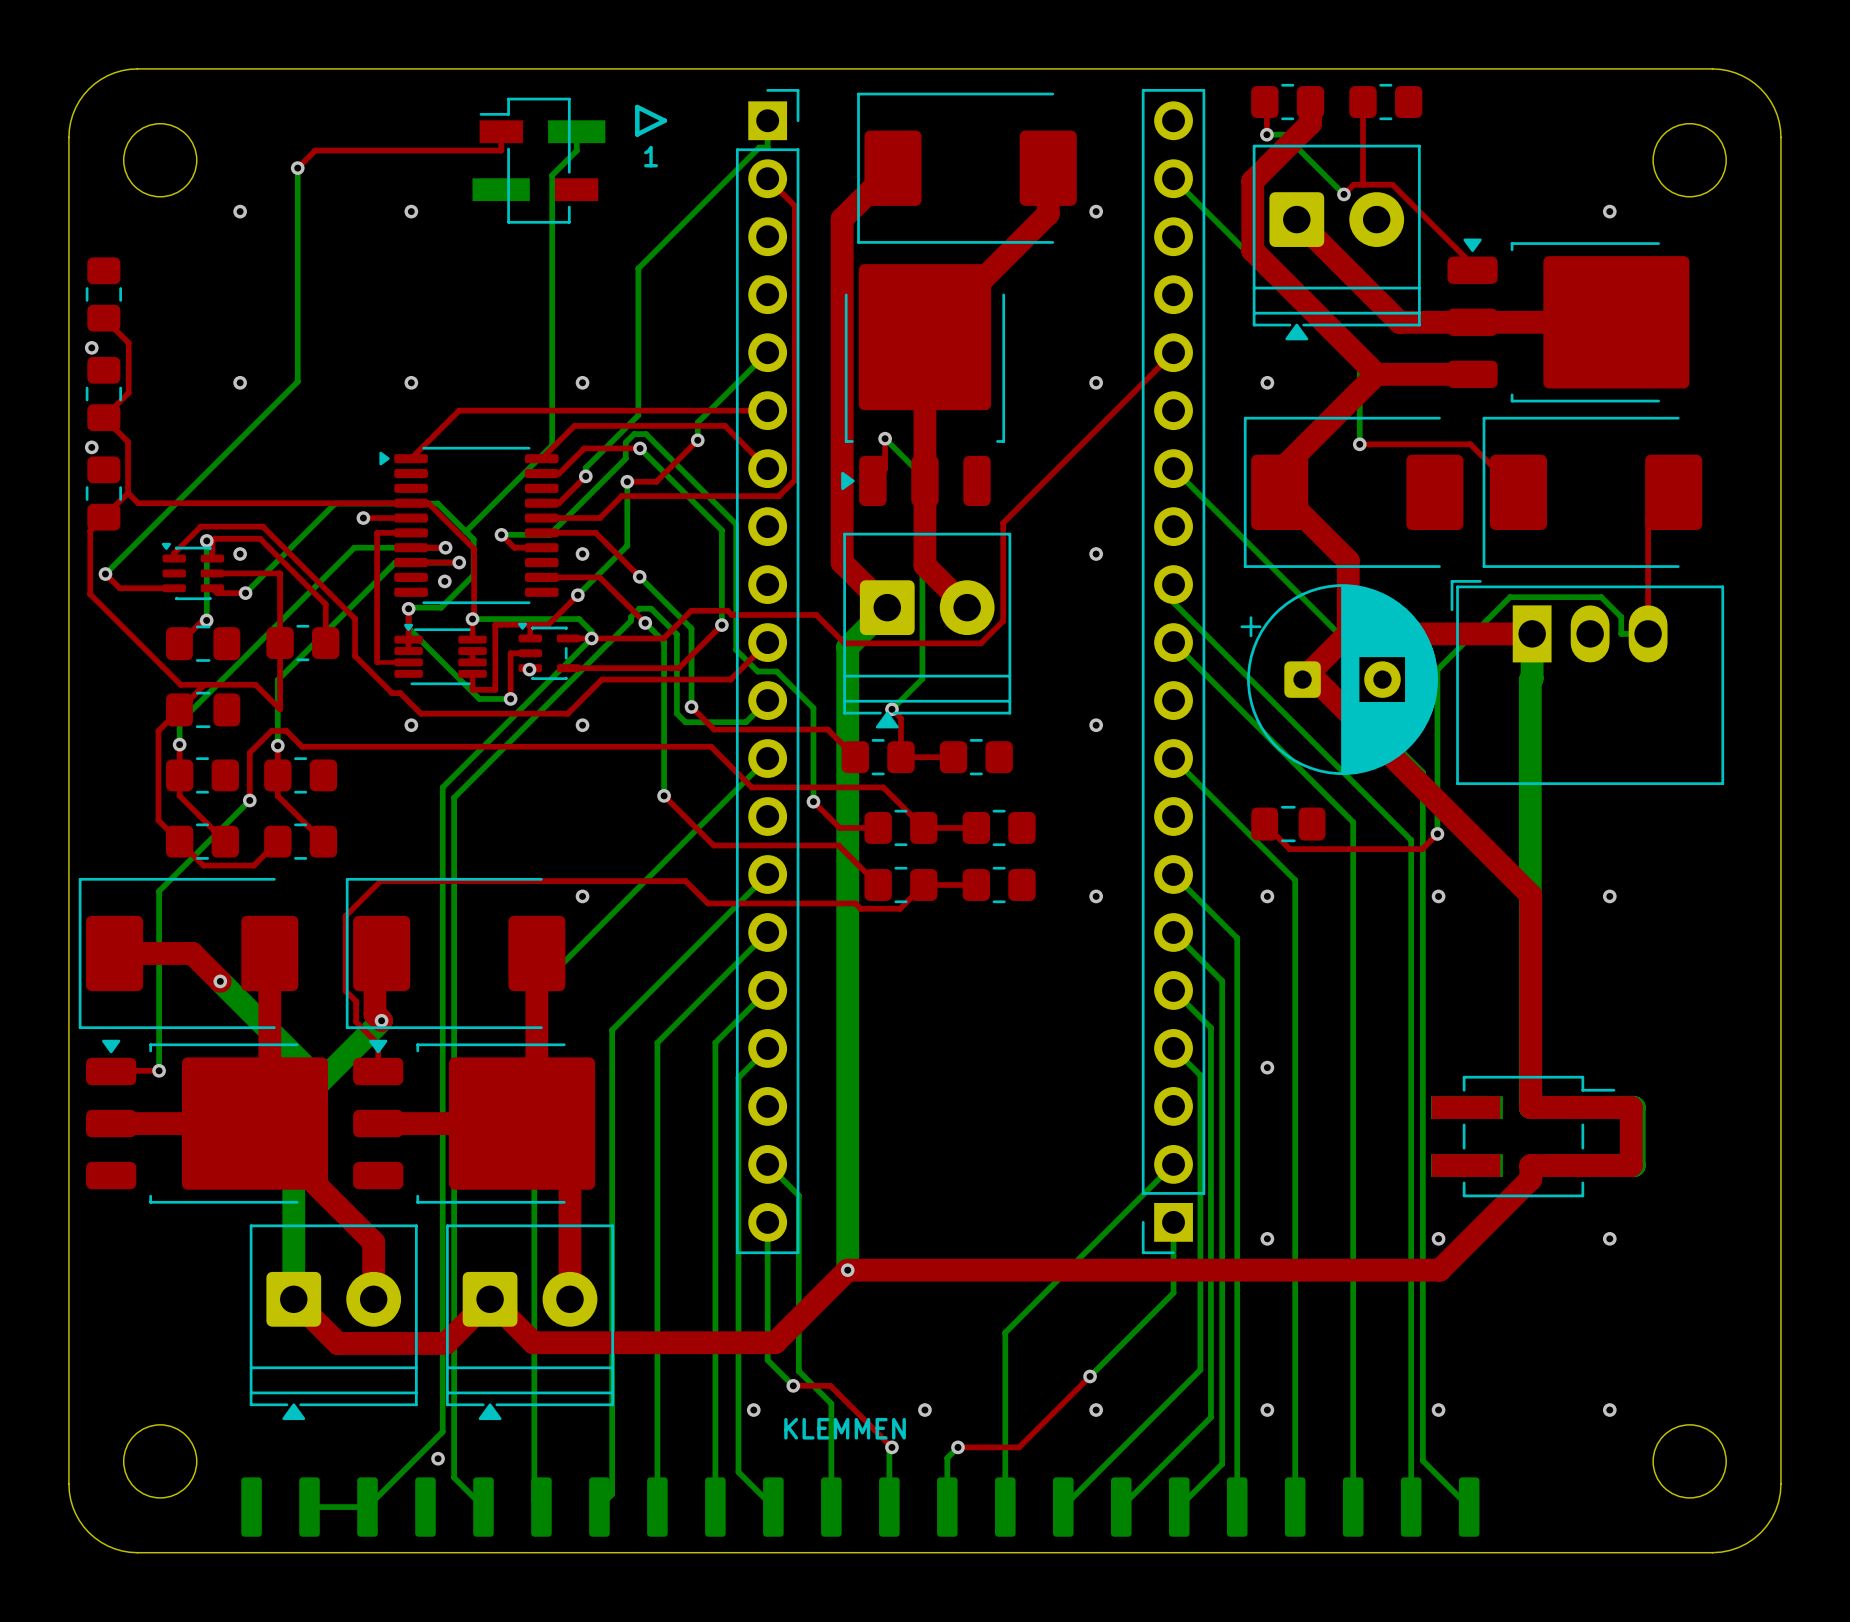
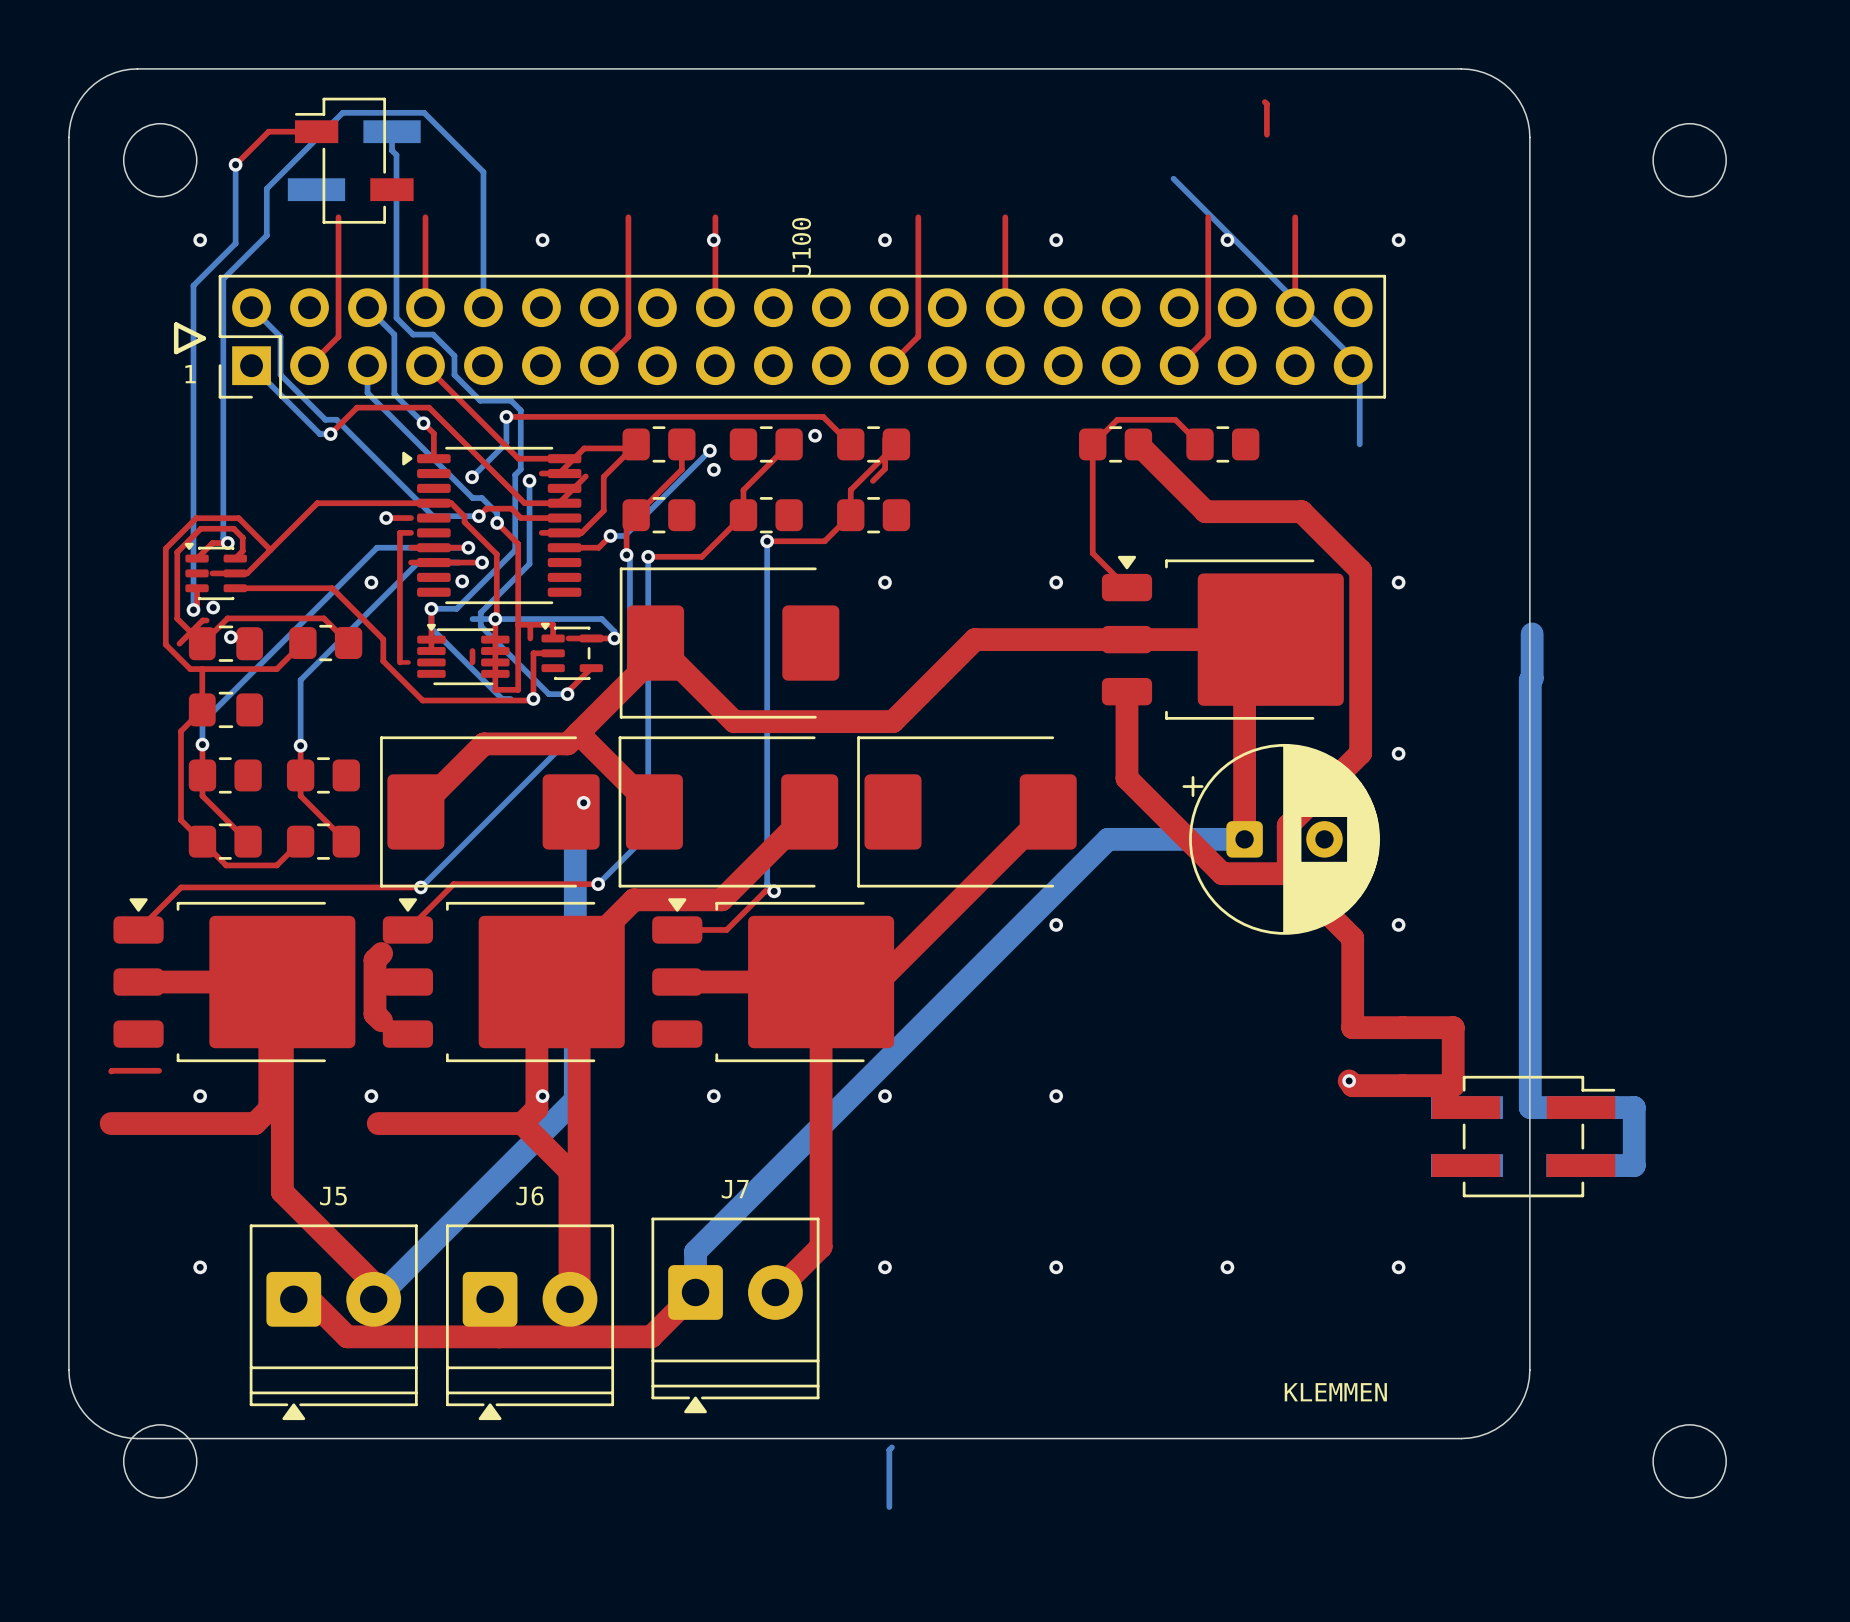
board edge: (1461, 68) (1720, 69) (1742, 75) (1760, 88) (1774, 107) (1779, 122) (1780, 137) (1780, 1484) (1775, 1510) (1760, 1532) (1738, 1547) (1712, 1552) (129, 1552) (107, 1545) (94, 1537) (79, 1520) (72, 1506) (68, 1484) (68, 1370) -> (1461, 68) (1484, 72) (1497, 79) (1509, 88) (1523, 107) (1528, 122) (1529, 137) (1529, 1370) (1524, 1396) (1509, 1418) (1487, 1433) (1461, 1438) (137, 1438) (122, 1436) (107, 1431) (88, 1418) (75, 1399) (70, 1385) (68, 1370)
part: (1287, 102) -> none
top track: (1310, 102) (1310, 123) (1252, 181) (1252, 250) (1376, 374) -> none
top track: (1363, 102) (1363, 184) -> none
part: (1385, 102) -> none
line: (637, 107) (637, 134) (664, 120) (637, 107) -> (176, 324) (176, 351) (203, 338) (176, 324)
bottom track: (767, 120) (767, 147) (759, 147) (638, 268) (638, 415) (585, 467) (585, 476) -> none
top track: none -> (316, 131) (268, 131) (235, 164)
top track: (501, 131) (501, 150) (315, 150) (297, 168) -> none
bottom track: (576, 131) (576, 150) (552, 175) (552, 445) (465, 531) -> none
bottom track: (1266, 134) (1284, 134) (1343, 194) -> none
via: (1266, 134) -> none
text position: 1 (651, 156) -> 1 (190, 374)
part position: (538, 160) -> (354, 160)
part position: (538, 160) -> (354, 160)
bottom track: none -> (235, 164) (235, 243) (193, 285) (193, 609)
via: none -> (235, 164)
bottom track: (297, 168) (297, 381) (105, 574) -> none
via: (297, 168) -> none
top track: (892, 168) (842, 219) (842, 562) (887, 607) -> none
part: (966, 168) -> none
top track: (1048, 168) (1048, 213) (924, 337) (924, 565) (967, 607) -> none
top track: (767, 178) (794, 205) (794, 480) (778, 496) (621, 496) (599, 518) (564, 518) -> none
top track: (1343, 194) (1353, 184) (1392, 184) (1472, 264) (1472, 270) -> none
via: (1343, 194) -> none
via: (240, 211) -> none
via: (411, 211) -> none
via position: (1096, 211) -> (1056, 240)
via: (1609, 211) -> none
top track: none -> (338, 217) (338, 336) (309, 365)
top track: none -> (425, 217) (425, 307)
top track: none -> (628, 217) (628, 336) (599, 365)
top track: none -> (715, 217) (715, 307)
top track: none -> (918, 217) (918, 336) (889, 365)
top track: none -> (1005, 217) (1005, 307)
top track: none -> (1208, 217) (1208, 336) (1179, 365)
top track: none -> (1295, 217) (1295, 307)
top track: (1296, 219) (1399, 322) (1616, 322) -> none
via: none -> (200, 240)
via: none -> (542, 240)
via: none -> (713, 240)
via: none -> (885, 240)
via: none -> (1227, 240)
via: none -> (1398, 240)
part: (1336, 242) -> none
part: (103, 294) -> none
bottom track: none -> (251, 307) (280, 336) (280, 374) (325, 419) (336, 419) (433, 516) (478, 516)
bottom track: none -> (367, 307) (394, 334) (394, 394) (423, 423)
bottom track: none -> (483, 307) (483, 172) (424, 112) (342, 112) (266, 188) (266, 235) (223, 279) (223, 538) (227, 543)
top track: (103, 318) (128, 342) (128, 392) (103, 417) (128, 441) (128, 493) -> none
part: (1568, 320) -> none
J100: none -> (802, 336)
via: (91, 347) -> none
bottom track: (767, 352) (697, 422) (697, 440) -> none
top track: (1173, 352) (1003, 523) (1003, 621) (980, 643) (844, 643) (816, 614) (731, 614) (727, 610) (691, 610) (663, 638) (614, 638) -> none
bottom track: none -> (251, 365) (319, 434) (330, 434)
bottom track: none -> (367, 365) (367, 392) (472, 498) (481, 498) (497, 513) (497, 523)
top track: none -> (425, 365) (518, 458) (564, 458)
top track: (1376, 374) (1472, 374) -> none
top track: (1376, 374) (1279, 471) (1279, 492) (1348, 560) (1348, 633) -> none
via: (240, 382) -> none
via position: (411, 382) -> (423, 423)
via: (582, 382) -> none
via: (1096, 382) -> none
via: (1267, 382) -> none
part: (923, 385) -> none
part: (103, 393) -> none
top track: (767, 410) (459, 410) (411, 458) -> none
top track: none -> (506, 416) (823, 416) (850, 444)
bottom track: none -> (506, 416) (506, 442) (472, 477)
via: none -> (506, 416)
top track: none -> (423, 423) (433, 433) (433, 458)
top track: none -> (330, 434) (357, 407) (429, 407) (524, 503) (541, 503)
via: none -> (330, 434)
via: none -> (815, 435)
bottom track: (885, 438) (922, 475) (922, 678) (892, 709) -> none
via: (885, 438) -> none
top track: (697, 440) (656, 481) (627, 481) -> none
via position: (697, 440) -> (709, 450)
part: none -> (659, 444)
top track: none -> (681, 444) (681, 469) (626, 524) (626, 555)
part: none -> (766, 444)
top track: none -> (789, 444) (743, 490) (743, 515) (701, 556) (648, 556)
part: none -> (873, 444)
top track: none -> (896, 444) (850, 490) (850, 515) (824, 541) (767, 541)
part: none -> (1115, 444)
top track: none -> (1138, 444) (1205, 511) (1301, 511) (1360, 570) (1360, 753) (1288, 825) (1288, 873)
top track: none -> (1200, 444) (1175, 419) (1117, 419) (1092, 444) (1092, 553) (1126, 587)
part: none -> (1222, 444)
top track: (1359, 444) (1470, 444) (1518, 492) -> none
via: (1359, 444) -> none
via: (91, 447) -> none
bottom track: (640, 448) (721, 530) (721, 625) -> none
via: (640, 448) -> none
bottom track: none -> (709, 450) (624, 535) (610, 535)
top track: (541, 458) (574, 425) (724, 425) (767, 468) -> none
bottom track: (1173, 468) (1346, 641) (1346, 695) (1422, 772) (1422, 1460) (1469, 1507) -> none
via: none -> (713, 469)
via: (585, 476) -> none
via: none -> (472, 477)
bottom track: none -> (529, 480) (529, 563) (480, 612) (480, 626) (548, 694) (567, 694)
via: none -> (529, 480)
bottom track: (627, 481) (627, 545) (577, 595) -> none
via: (627, 481) -> none
part: (1353, 492) -> none
part: (1592, 492) -> none
top track: (1673, 492) (1648, 517) (1648, 633) -> none
part: (103, 493) -> none
top track: (128, 493) (138, 503) (317, 503) -> (247, 573) (317, 503)
top track: (128, 493) (90, 530) (90, 594) (180, 684) (255, 684) (280, 709) (280, 573) (247, 573) -> none
top track: (428, 503) (474, 548) (472, 639) -> (428, 503) (451, 503) (464, 516) (464, 522) (496, 554) (495, 624)
part: none -> (659, 515)
part: none -> (766, 515)
part: none -> (873, 515)
top track: none -> (478, 516) (486, 508) (511, 508) (520, 518) (541, 518)
via: none -> (478, 516)
top track: (363, 518) (386, 518) -> (445, 547) (468, 547)
via position: (363, 518) -> (386, 518)
part position: (468, 525) -> (491, 525)
top track: (399, 532) (377, 532) (377, 662) (399, 662) -> (399, 532) (399, 662)
top track: (581, 532) (595, 532) (639, 576) -> (581, 532) (603, 510) (603, 476) (636, 444)
top track: (501, 534) (514, 547) (541, 547) -> none
bottom track: (501, 534) (549, 534) (625, 458) (625, 442) (634, 434) (646, 434) (736, 524) (736, 650) (757, 671) (776, 671) (813, 708) (813, 801) -> none
via position: (501, 534) -> (497, 523)
top track: none -> (610, 535) (598, 547) (564, 547)
via: none -> (610, 535)
bottom track: (206, 540) (206, 620) -> none
via: (206, 540) -> none
top track: (212, 540) (212, 558) -> none
top track: (212, 540) (214, 538) (260, 538) (325, 604) (325, 643) -> none
bottom track: none -> (767, 541) (767, 884) (774, 891)
via: none -> (767, 541)
top track: none -> (227, 543) (212, 543) (197, 558)
bottom track: (377, 547) (354, 547) (179, 722) (179, 744) -> (377, 547) (202, 722) (202, 744)
via: (445, 547) -> none
via: none -> (468, 547)
top track: none -> (270, 550) (238, 518) (196, 518) (165, 548) (165, 644) (190, 669) (276, 669) (302, 643)
via position: (240, 554) -> (227, 543)
via: (582, 554) -> none
via position: (1096, 554) -> (1056, 582)
bottom track: none -> (626, 555) (629, 558) (629, 678) (420, 887)
via: none -> (626, 555)
bottom track: none -> (648, 556) (648, 834) (598, 884)
via: none -> (648, 556)
top track: (174, 558) (174, 553) (200, 526) (262, 526) (355, 618) (355, 656) (392, 693) (400, 693) (420, 713) (567, 713) (601, 679) (730, 679) (767, 642) -> none
top track: none -> (235, 558) (242, 551) (242, 537) (233, 528) (200, 528) (177, 552) (177, 618) (202, 643) (227, 618) (323, 618) (348, 643)
bottom track: (418, 562) (395, 562) (277, 680) (277, 745) -> (418, 562) (300, 680) (300, 745)
via: (459, 562) -> none
via: none -> (482, 562)
part position: (192, 571) -> (215, 571)
top track: (105, 574) (119, 588) (174, 588) -> none
via: (105, 574) -> none
bottom track: (639, 576) (691, 628) (691, 706) -> none
via: (639, 576) -> none
top track: (541, 577) (599, 577) (645, 622) -> none
via: (444, 581) -> none
via: none -> (462, 581)
via: none -> (371, 582)
via: none -> (885, 582)
via: none -> (1398, 582)
bottom track: (1173, 584) (1173, 602) (1411, 840) (1411, 1507) -> none
top track: none -> (197, 588) (197, 606) (193, 609)
top track: (212, 588) (217, 593) (245, 593) -> none
top track: none -> (235, 588) (332, 588) (383, 639) (383, 661) (422, 700) (531, 700) (533, 698) (533, 653) (553, 653)
bottom track: (245, 593) (335, 503) (437, 503) (473, 539) (473, 575) (441, 607) (409, 607) (408, 628) (479, 698) (502, 698) -> (392, 131) (392, 150) (396, 155) (396, 317) (413, 334) (433, 334) (454, 355) (454, 374) (480, 400) (511, 400) (520, 410) (520, 469) (515, 474) (515, 550) (456, 608) (431, 608) (431, 628) (502, 698)
via: (245, 593) -> none
top track: (577, 595) (548, 624) -> (553, 638) (553, 624) (548, 624)
via: (577, 595) -> none
via: none -> (213, 607)
bottom track: (887, 607) (847, 647) (847, 1270) -> none
top track: (408, 608) (408, 651) -> (431, 608) (431, 651)
via: (408, 608) -> none
via: none -> (431, 608)
via: none -> (193, 609)
via: (472, 619) -> none
via: none -> (495, 619)
bottom track: (579, 619) (591, 631) (591, 638) (442, 787) (442, 1431) (367, 1507) (309, 1507) -> (579, 619) (601, 619) (614, 631) (614, 638)
via: (206, 620) -> none
bottom track: (645, 622) (664, 641) (664, 795) -> none
via: (645, 622) -> none
top track: (495, 624) (518, 624) -> (459, 562) (482, 562)
top track: (721, 625) (678, 668) (568, 668) -> none
via: (721, 625) -> none
part: (927, 630) -> none
top track: (1348, 633) (1302, 679) (1315, 679) (1530, 894) (1530, 1107) (1631, 1107) (1631, 1165) (1530, 1165) (1530, 1179) (1439, 1270) (847, 1270) (775, 1342) (533, 1342) (490, 1299) (445, 1343) (337, 1343) (293, 1299) -> none
top track: (1348, 633) (1532, 633) -> none
bottom track: (1648, 633) (1621, 633) (1621, 617) (1601, 597) (1510, 597) (1437, 669) (1437, 833) -> none
via: none -> (230, 637)
part: none -> (1222, 637)
via: (591, 638) -> none
via: none -> (614, 638)
bottom track: (1173, 642) (1353, 822) (1353, 1507) -> none
part position: (203, 643) -> (225, 643)
part position: (302, 643) -> (325, 643)
part: none -> (729, 643)
part position: (549, 651) -> (571, 651)
top track: (530, 653) (510, 653) (510, 698) -> none
part position: (440, 654) -> (463, 654)
top track: none -> (1244, 665) (1244, 839)
top track: none -> (1244, 665) (1218, 639) (974, 639) (892, 721) (734, 721) (655, 643) (655, 655) (567, 743) (483, 743) (415, 811)
top track: none -> (591, 668) (567, 694)
top track: none -> (202, 669) (202, 709) (180, 731) (180, 820) (226, 865) (276, 865) (300, 841)
via: (529, 669) -> none
part: (767, 671) -> none
part: (1173, 671) -> none
top track: (472, 673) (472, 689) (495, 689) -> (497, 523) (518, 543) (518, 689) (495, 689)
part: (1339, 679) -> none
part: (1587, 682) -> none
top track: (204, 684) (158, 730) (158, 820) (203, 865) (253, 865) (277, 841) -> none
top track: none -> (1126, 691) (1126, 778) (1222, 873) (1288, 873)
via: none -> (567, 694)
via: (510, 698) -> none
via: none -> (533, 698)
bottom track: (767, 700) (746, 722) (685, 722) (676, 713) (676, 634) (651, 608) (639, 608) (630, 617) (630, 620) (454, 797) (454, 1477) (483, 1507) -> none
top track: (691, 706) (714, 729) (827, 729) (855, 757) -> none
via: (691, 706) -> none
part position: (203, 709) -> (225, 709)
top track: (892, 709) (900, 718) (900, 757) (953, 757) -> none
via: (892, 709) -> none
via: (411, 725) -> none
via: (582, 725) -> none
via: (1096, 725) -> none
top track: none -> (578, 733) (654, 809) (654, 811)
top track: (179, 744) (179, 795) (225, 841) -> (202, 744) (202, 795) (248, 841)
via position: (179, 744) -> (202, 744)
top track: (277, 745) (277, 795) (323, 841) -> (300, 745) (300, 795) (346, 841)
via position: (277, 745) -> (300, 745)
via: none -> (1398, 753)
part: (878, 757) -> none
part: (976, 757) -> none
bottom track: (767, 758) (534, 991) (534, 1499) (541, 1507) -> none
bottom track: (1173, 758) (1295, 880) (1295, 1507) -> none
part position: (202, 775) -> (225, 775)
part position: (300, 775) -> (323, 775)
top track: (664, 795) (713, 845) (838, 845) (878, 885) -> none
via: (664, 795) -> none
top track: (249, 800) (249, 752) (271, 730) (286, 730) (302, 746) (711, 746) (751, 787) (883, 787) (923, 827) (976, 827) -> none
bottom track: (249, 800) (159, 891) (159, 1070) -> none
via: (249, 800) -> none
top track: (813, 801) (839, 827) (878, 827) -> none
via: (813, 801) -> none
bottom track: none -> (583, 802) (575, 811) (575, 1099) (382, 1292)
via: none -> (583, 802)
part footprint: [1251, 805, 1326, 843] -> [1182, 743, 1380, 935]
part: none -> (728, 811)
top track: none -> (809, 811) (721, 899) (633, 899) (551, 982) (579, 1009) (579, 1292)
part: none -> (966, 811)
top track: none -> (1048, 811) (878, 982) (677, 982)
top track: (1264, 824) (1289, 849) (1422, 849) (1437, 833) -> none
part: (900, 827) -> none
part: (999, 827) -> none
via: (1437, 833) -> none
bottom track: none -> (1244, 839) (1107, 839) (695, 1251) (695, 1292)
part position: (202, 841) -> (225, 841)
part position: (300, 841) -> (323, 841)
top track: none -> (1288, 873) (1352, 938) (1352, 1027) (1453, 1027) (1453, 1085) (1352, 1085) (1349, 1080)
bottom track: (767, 874) (612, 1030) (612, 1494) (599, 1507) -> none
bottom track: (1173, 874) (1237, 938) (1237, 1507) -> none
top track: none -> (598, 884) (453, 884) (407, 929)
part: (900, 885) -> none
top track: (976, 885) (923, 885) (900, 908) (860, 908) (855, 903) (708, 903) (685, 881) (380, 881) (345, 916) (345, 990) (356, 1001) (356, 1021) (378, 1044) (378, 1071) -> none
part: (999, 885) -> none
top track: none -> (420, 887) (181, 887) (138, 929)
via: none -> (420, 887)
top track: none -> (774, 891) (765, 891) (726, 929) (677, 929)
via: none -> (774, 891)
via position: (582, 896) -> (598, 884)
via position: (1096, 896) -> (1056, 924)
via: (1267, 896) -> none
via position: (1438, 896) -> (1398, 924)
via: (1609, 896) -> none
bottom track: (767, 932) (657, 1042) (657, 1507) -> none
bottom track: (1173, 932) (1222, 981) (1222, 1464) (1179, 1507) -> none
top track: (114, 953) (192, 953) (220, 981) -> none
part: (188, 953) -> none
part position: (455, 953) -> (489, 811)
part: none -> (234, 980)
part: none -> (503, 980)
part: none -> (773, 980)
bottom track: (220, 981) (320, 1081) -> none
via: (220, 981) -> none
top track: none -> (138, 982) (282, 982) (282, 1192) (382, 1292)
top track: none -> (821, 982) (821, 1246) (775, 1292)
bottom track: (767, 990) (715, 1042) (715, 1507) -> none
bottom track: (1173, 990) (1210, 1027) (1210, 1417) (1121, 1507) -> none
bottom track: (381, 1020) (293, 1108) (293, 1299) -> none
via: (381, 1020) -> none
bottom track: (767, 1048) (738, 1077) (738, 1472) (773, 1507) -> none
bottom track: (1173, 1048) (1200, 1075) (1200, 1369) (1063, 1507) -> none
via position: (1267, 1067) -> (1349, 1080)
via position: (159, 1070) -> (200, 1096)
via: none -> (371, 1096)
via: none -> (542, 1096)
via: none -> (713, 1096)
via: none -> (885, 1096)
via: none -> (1056, 1096)
part: (207, 1121) -> none
part: (474, 1121) -> none
top track: (254, 1123) (373, 1242) (373, 1299) -> none
bottom track: (767, 1164) (798, 1195) (798, 1371) (831, 1403) (831, 1507) -> none
bottom track: (1173, 1164) (1005, 1332) (1005, 1507) -> none
J5 name: none -> J5 (333, 1196)
J6 name: none -> J6 (529, 1195)
bottom track: (767, 1222) (767, 1360) (793, 1385) -> none
bottom track: (1173, 1222) (1173, 1292) (1090, 1376) -> none
via position: (1267, 1238) -> (1227, 1267)
via position: (1438, 1238) -> (1398, 1267)
via: (1609, 1238) -> none
via: none -> (200, 1267)
via: none -> (1056, 1267)
via position: (847, 1270) -> (885, 1267)
top track: none -> (302, 1292) (347, 1336) (651, 1336) (695, 1292)
J7: none -> (735, 1315)
top track: (1090, 1376) (1019, 1447) (957, 1447) -> none
via: (1090, 1376) -> none
top track: (793, 1385) (830, 1385) (891, 1447) -> none
via: (793, 1385) -> none
via: (753, 1410) -> none
via: (924, 1410) -> none
via: (1096, 1410) -> none
via: (1267, 1410) -> none
via: (1438, 1410) -> none
via: (1609, 1410) -> none
text position: KLEMMEN (845, 1428) -> KLEMMEN (1335, 1392)
via: (891, 1447) -> none
bottom track: (957, 1447) (947, 1458) (947, 1507) -> none
via: (957, 1447) -> none
via: (438, 1458) -> none
part: (338, 1507) -> none
part: (976, 1507) -> none

